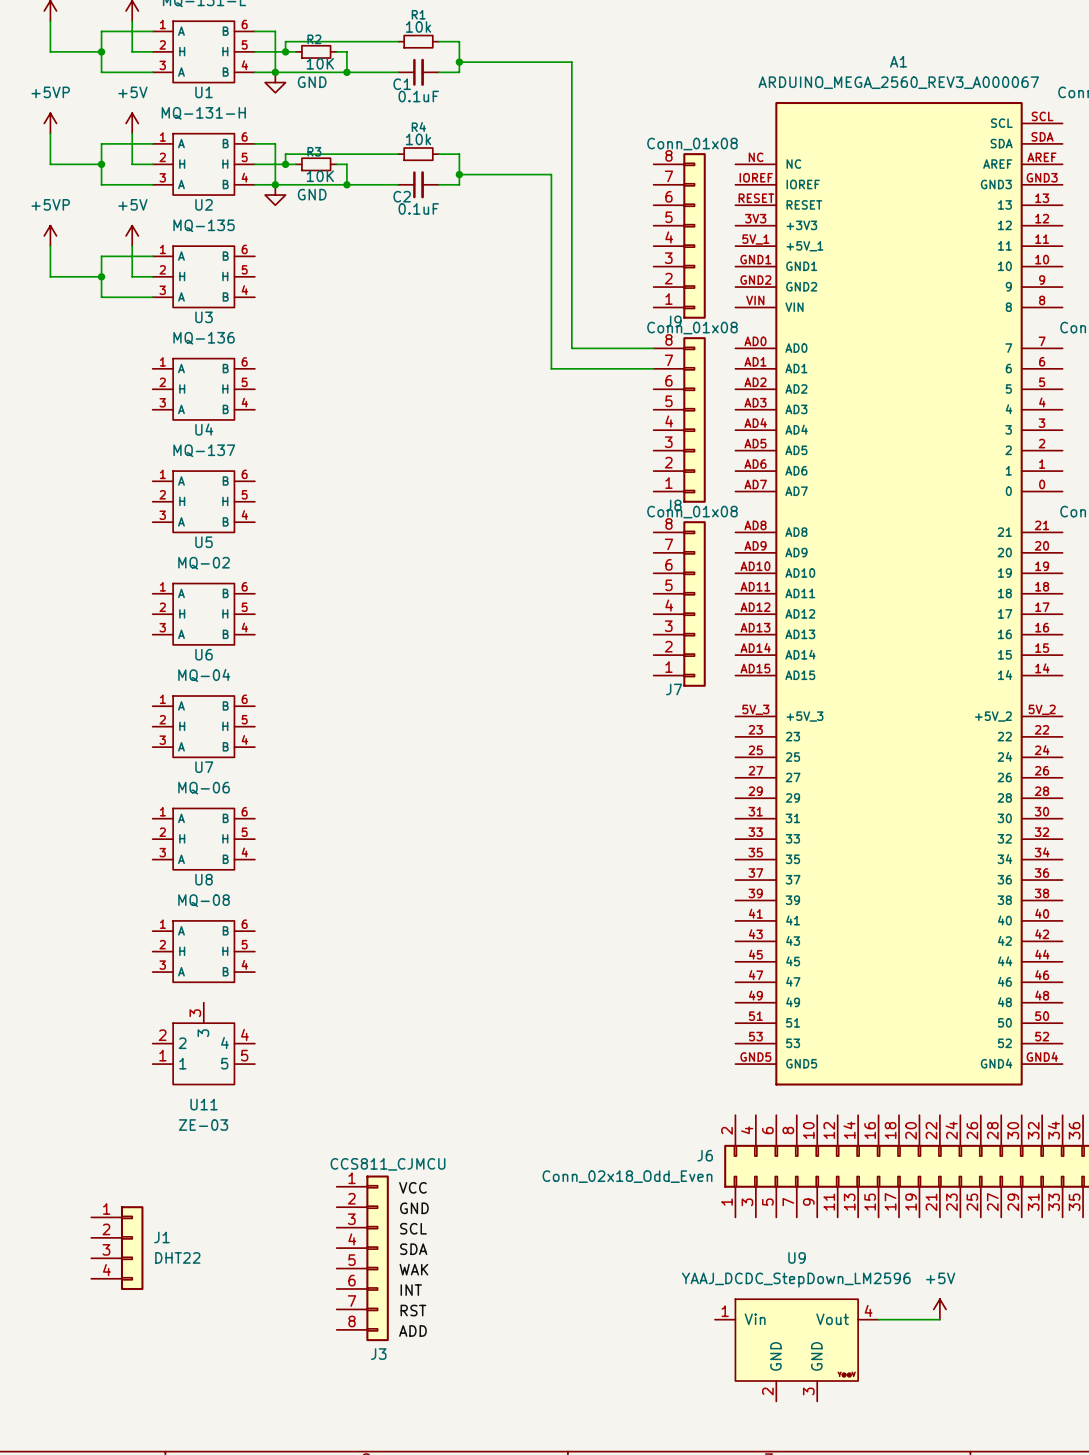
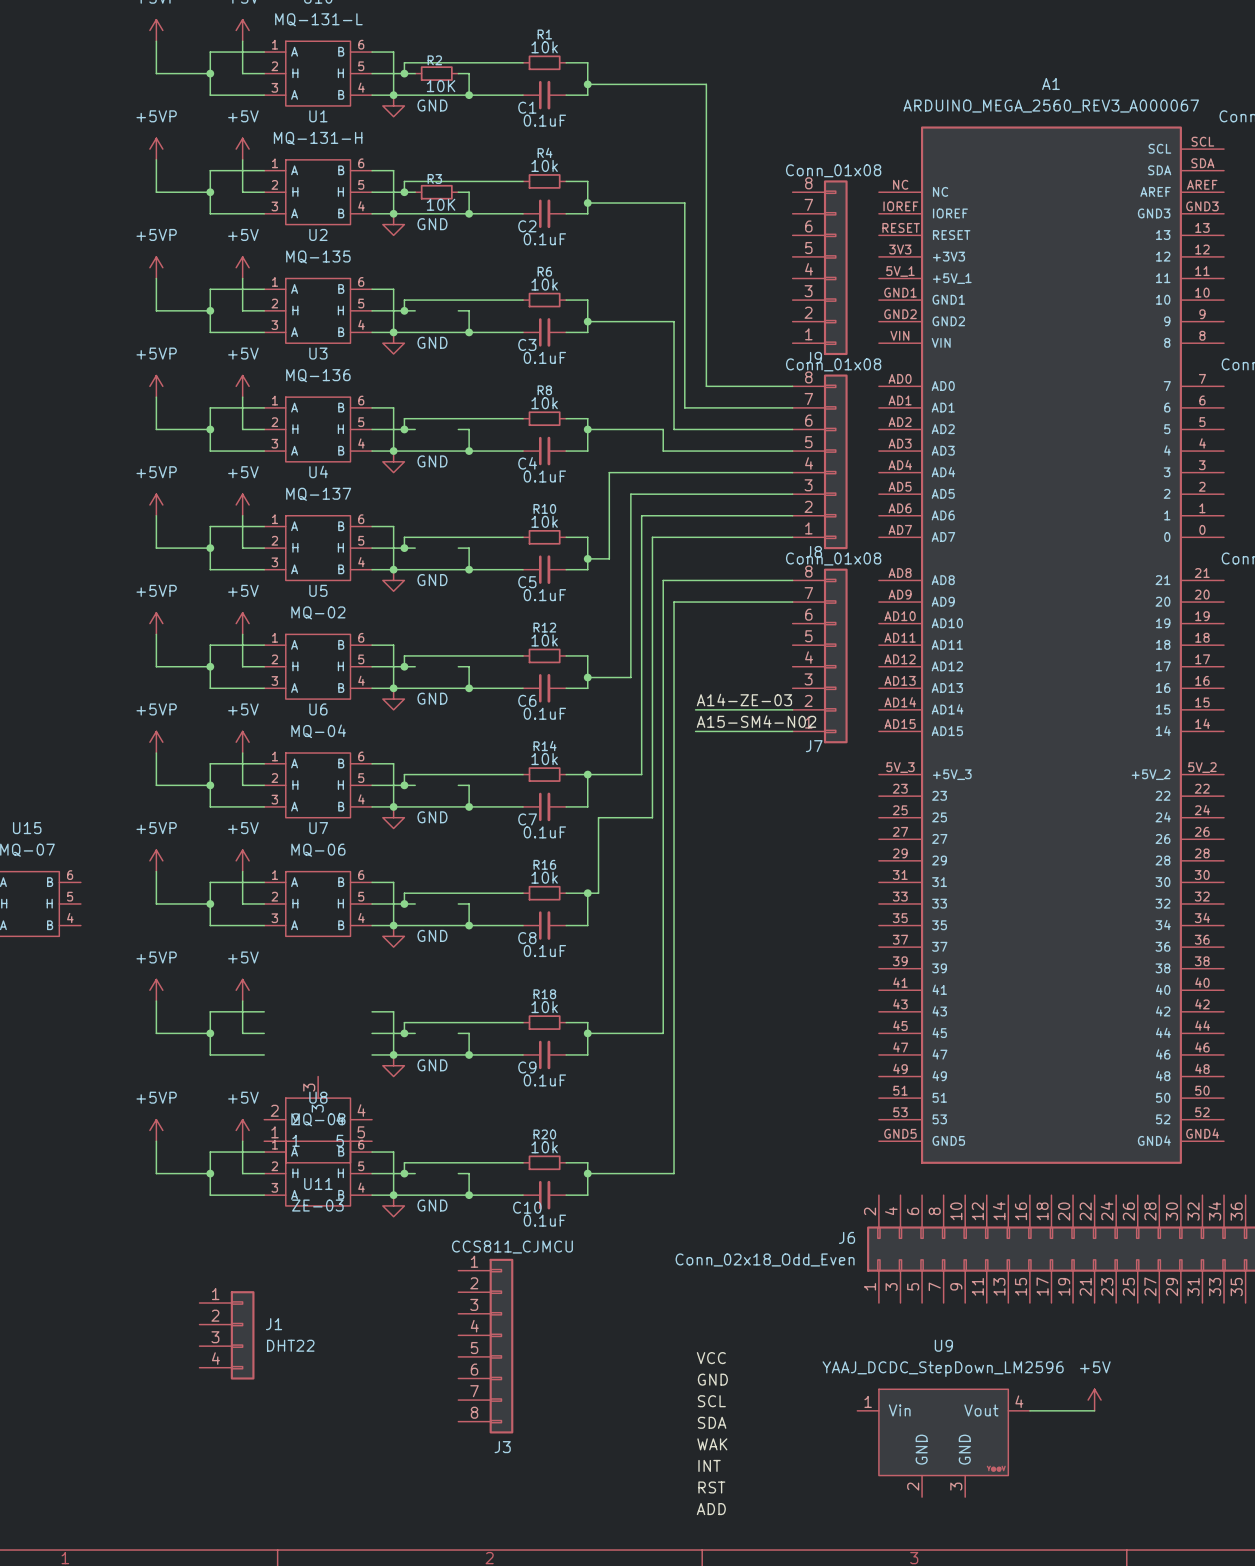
wire: none -> (372, 289) (393, 289) (393, 332)
wire: none -> (523, 300) (404, 300) (404, 310)
R6: none -> 10k (544, 300)
wire: none -> (566, 300) (587, 300) (587, 332) (566, 332)
wire: none -> (372, 310) (415, 310)
junction: none -> (404, 310)
wire: none -> (458, 310) (469, 310) (469, 332)
wire: none -> (587, 321) (674, 321) (674, 429) (792, 429)
junction: none -> (587, 321)
wire: none -> (372, 332) (523, 332)
junction: none -> (393, 332)
junction: none -> (469, 332)
C3: none -> 0.1uF (544, 332)
power symbol: none -> GND (393, 343)
power symbol: none -> +5VP (156, 386)
power symbol: none -> +5V (242, 386)
wire: none -> (156, 397) (156, 429) (210, 429)
wire: none -> (242, 397) (242, 429) (264, 429)
wire: none -> (264, 407) (210, 407) (210, 451) (264, 451)
wire: none -> (372, 407) (393, 407) (393, 451)
wire: none -> (523, 418) (404, 418) (404, 429)
R8: none -> 10k (544, 418)
wire: none -> (566, 418) (587, 418) (587, 451) (566, 451)
junction: none -> (210, 429)
wire: none -> (372, 429) (415, 429)
junction: none -> (404, 429)
wire: none -> (458, 429) (469, 429) (469, 451)
wire: none -> (587, 429) (663, 429) (663, 451) (792, 451)
junction: none -> (587, 429)
wire: none -> (372, 451) (523, 451)
junction: none -> (393, 451)
junction: none -> (469, 451)
C4: none -> 0.1uF (544, 451)
power symbol: none -> GND (393, 461)
wire: none -> (792, 472) (609, 472) (609, 558) (587, 558)
wire: none -> (792, 494) (630, 494) (630, 677) (587, 677)
power symbol: none -> +5VP (156, 504)
power symbol: none -> +5V (242, 504)
wire: none -> (156, 515) (156, 548) (210, 548)
wire: none -> (242, 515) (242, 548) (264, 548)
wire: none -> (792, 515) (641, 515) (641, 774) (566, 774)
wire: none -> (264, 526) (210, 526) (210, 569) (264, 569)
wire: none -> (372, 526) (393, 526) (393, 569)
wire: none -> (523, 537) (404, 537) (404, 548)
R10: none -> 10k (544, 537)
wire: none -> (566, 537) (587, 537) (587, 569) (566, 569)
wire: none -> (792, 537) (652, 537) (652, 817) (598, 817) (598, 893) (566, 893)
junction: none -> (210, 548)
wire: none -> (372, 548) (415, 548)
junction: none -> (404, 548)
wire: none -> (458, 548) (469, 548) (469, 569)
junction: none -> (587, 558)
wire: none -> (372, 569) (523, 569)
junction: none -> (393, 569)
junction: none -> (469, 569)
C5: none -> 0.1uF (544, 569)
power symbol: none -> GND (393, 580)
wire: none -> (792, 580) (663, 580) (663, 1033) (587, 1033)
wire: none -> (792, 602) (674, 602) (674, 1173) (587, 1173)
power symbol: none -> +5VP (156, 623)
power symbol: none -> +5V (242, 623)
wire: none -> (156, 634) (156, 666) (210, 666)
wire: none -> (242, 634) (242, 666) (264, 666)
wire: none -> (264, 645) (210, 645) (210, 688) (264, 688)
wire: none -> (372, 645) (393, 645) (393, 688)
wire: none -> (523, 655) (404, 655) (404, 666)
R12: none -> 10k (544, 655)
wire: none -> (566, 655) (587, 655) (587, 688) (566, 688)
junction: none -> (210, 666)
wire: none -> (372, 666) (415, 666)
junction: none -> (404, 666)
wire: none -> (458, 666) (469, 666) (469, 688)
junction: none -> (587, 677)
wire: none -> (372, 688) (523, 688)
junction: none -> (393, 688)
junction: none -> (469, 688)
C6: none -> 0.1uF (544, 688)
power symbol: none -> GND (393, 699)
label: none -> A14-ZE-03 (744, 699)
wire: none -> (695, 709) (792, 709)
label: none -> A15-SM4-N02 (756, 721)
wire: none -> (695, 731) (792, 731)
power symbol: none -> +5VP (156, 742)
power symbol: none -> +5V (242, 742)
wire: none -> (156, 753) (156, 785) (210, 785)
wire: none -> (242, 753) (242, 785) (264, 785)
wire: none -> (264, 763) (210, 763) (210, 806) (264, 806)
wire: none -> (372, 763) (393, 763) (393, 806)
wire: none -> (523, 774) (404, 774) (404, 785)
R14: none -> 10k (544, 774)
wire: none -> (587, 774) (587, 806) (566, 806)
junction: none -> (587, 774)
junction: none -> (210, 785)
wire: none -> (372, 785) (415, 785)
junction: none -> (404, 785)
wire: none -> (458, 785) (469, 785) (469, 806)
wire: none -> (372, 806) (523, 806)
junction: none -> (393, 806)
junction: none -> (469, 806)
C7: none -> 0.1uF (544, 806)
power symbol: none -> GND (393, 817)
power symbol: none -> +5VP (156, 860)
power symbol: none -> +5V (242, 860)
wire: none -> (156, 871) (156, 903) (210, 903)
wire: none -> (242, 871) (242, 903) (264, 903)
wire: none -> (264, 882) (210, 882) (210, 925) (264, 925)
wire: none -> (372, 882) (393, 882) (393, 925)
wire: none -> (523, 893) (404, 893) (404, 903)
R16: none -> 10k (544, 893)
wire: none -> (587, 893) (587, 925) (566, 925)
junction: none -> (587, 893)
junction: none -> (210, 903)
wire: none -> (372, 903) (415, 903)
junction: none -> (404, 903)
wire: none -> (458, 903) (469, 903) (469, 925)
wire: none -> (372, 925) (523, 925)
junction: none -> (393, 925)
junction: none -> (469, 925)
C8: none -> 0.1uF (544, 925)
power symbol: none -> GND (393, 936)
power symbol: none -> +5VP (156, 990)
power symbol: none -> +5V (242, 990)
wire: none -> (156, 1001) (156, 1033) (210, 1033)
wire: none -> (242, 1001) (242, 1033) (264, 1033)
wire: none -> (264, 1011) (210, 1011) (210, 1054) (264, 1054)
wire: none -> (372, 1011) (393, 1011) (393, 1054)
U8 position: (203, 951) -> (318, 1173)
wire: none -> (523, 1022) (404, 1022) (404, 1033)
R18: none -> 10k (544, 1022)
wire: none -> (566, 1022) (587, 1022) (587, 1054) (566, 1054)
junction: none -> (210, 1033)
wire: none -> (372, 1033) (415, 1033)
junction: none -> (404, 1033)
wire: none -> (458, 1033) (469, 1033) (469, 1054)
junction: none -> (587, 1033)
wire: none -> (372, 1054) (523, 1054)
junction: none -> (393, 1054)
junction: none -> (469, 1054)
C9: none -> 0.1uF (544, 1054)
power symbol: none -> GND (393, 1065)
power symbol: none -> +5VP (156, 1130)
power symbol: none -> +5V (242, 1130)
wire: none -> (156, 1141) (156, 1173) (210, 1173)
wire: none -> (242, 1141) (242, 1173) (264, 1173)
wire: none -> (264, 1152) (210, 1152) (210, 1195) (264, 1195)
wire: none -> (372, 1152) (393, 1152) (393, 1195)
wire: none -> (523, 1162) (404, 1162) (404, 1173)
R20: none -> 10k (544, 1162)
wire: none -> (566, 1162) (587, 1162) (587, 1195) (566, 1195)
junction: none -> (210, 1173)
wire: none -> (372, 1173) (415, 1173)
junction: none -> (404, 1173)
wire: none -> (458, 1173) (469, 1173) (469, 1195)
junction: none -> (587, 1173)
wire: none -> (372, 1195) (523, 1195)
junction: none -> (393, 1195)
junction: none -> (469, 1195)
C10: none -> 0.1uF (544, 1195)
power symbol: none -> GND (393, 1205)
label position: VCC (412, 1187) -> VCC (711, 1358)
label position: GND (414, 1208) -> GND (712, 1379)
label position: SCL (413, 1228) -> SCL (711, 1401)
label position: SDA (413, 1249) -> SDA (712, 1422)
label position: WAK (413, 1269) -> WAK (712, 1444)
label position: INT (411, 1290) -> INT (709, 1465)
label position: RST (413, 1310) -> RST (711, 1487)
label position: ADD (412, 1330) -> ADD (711, 1509)

